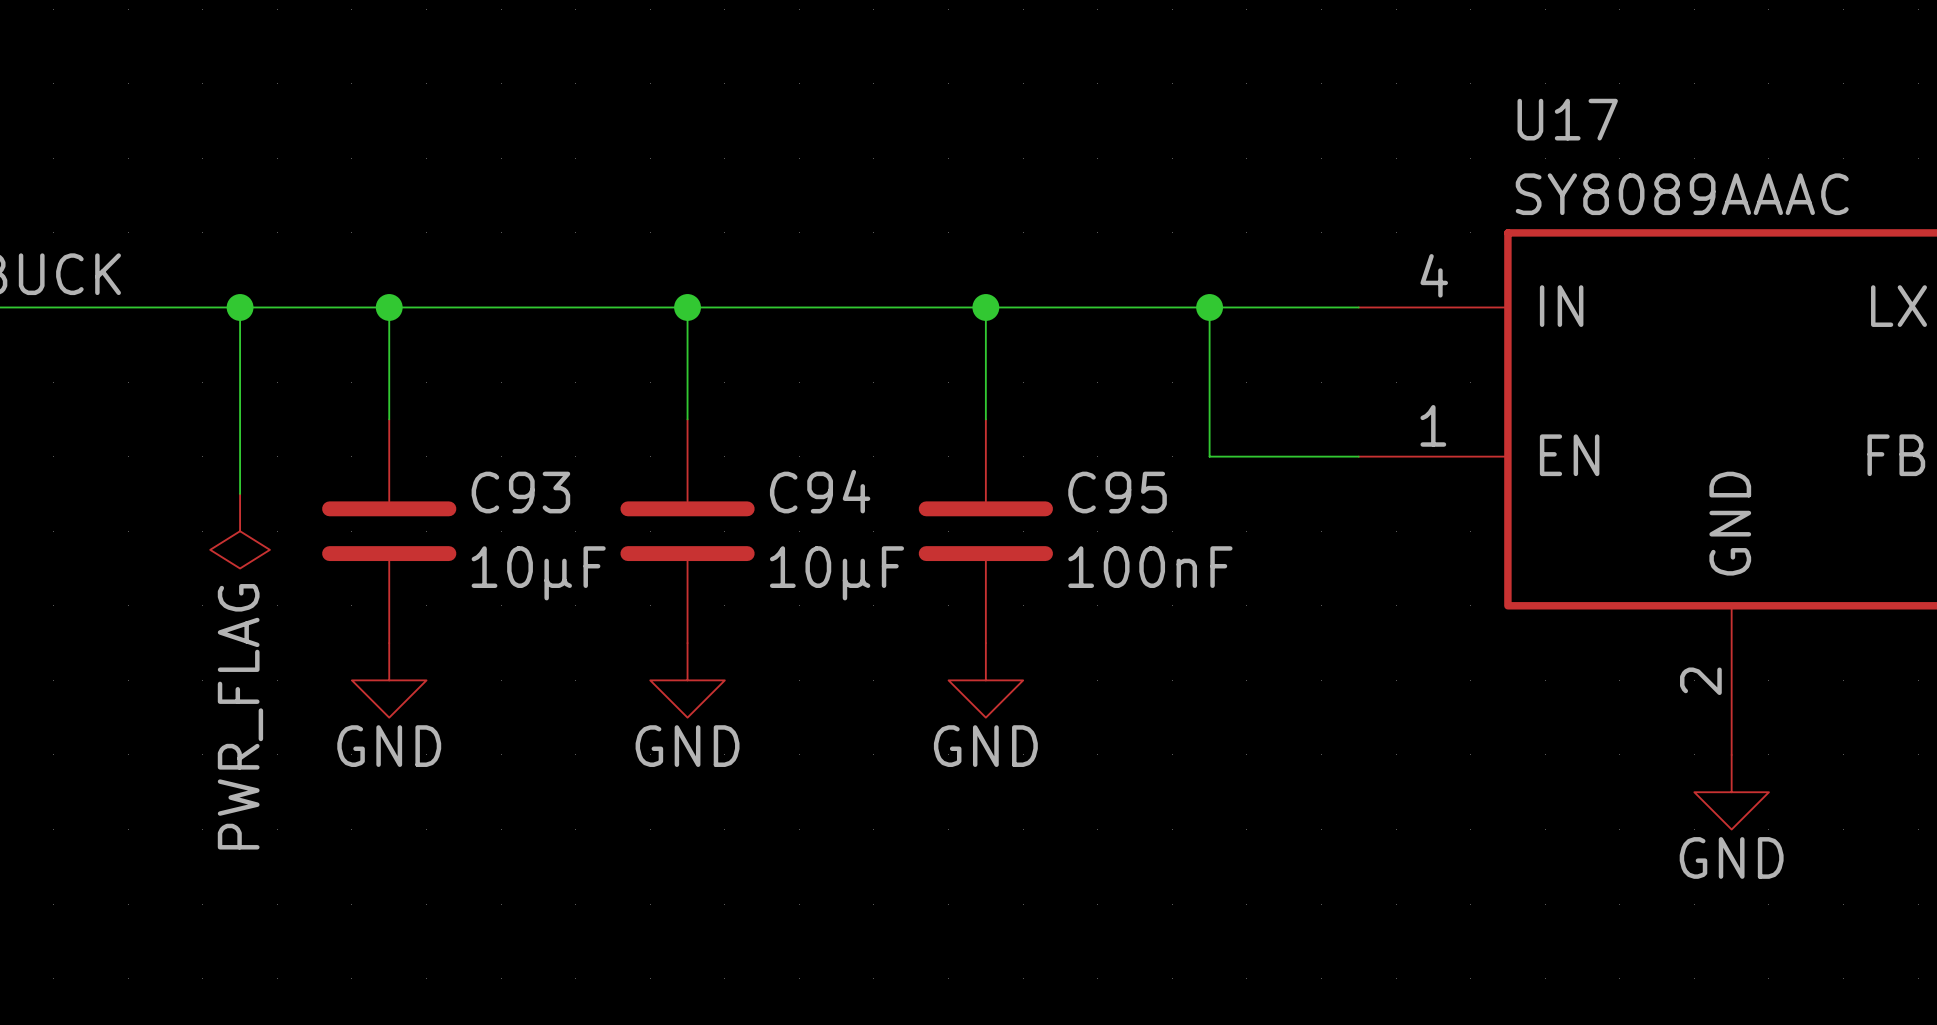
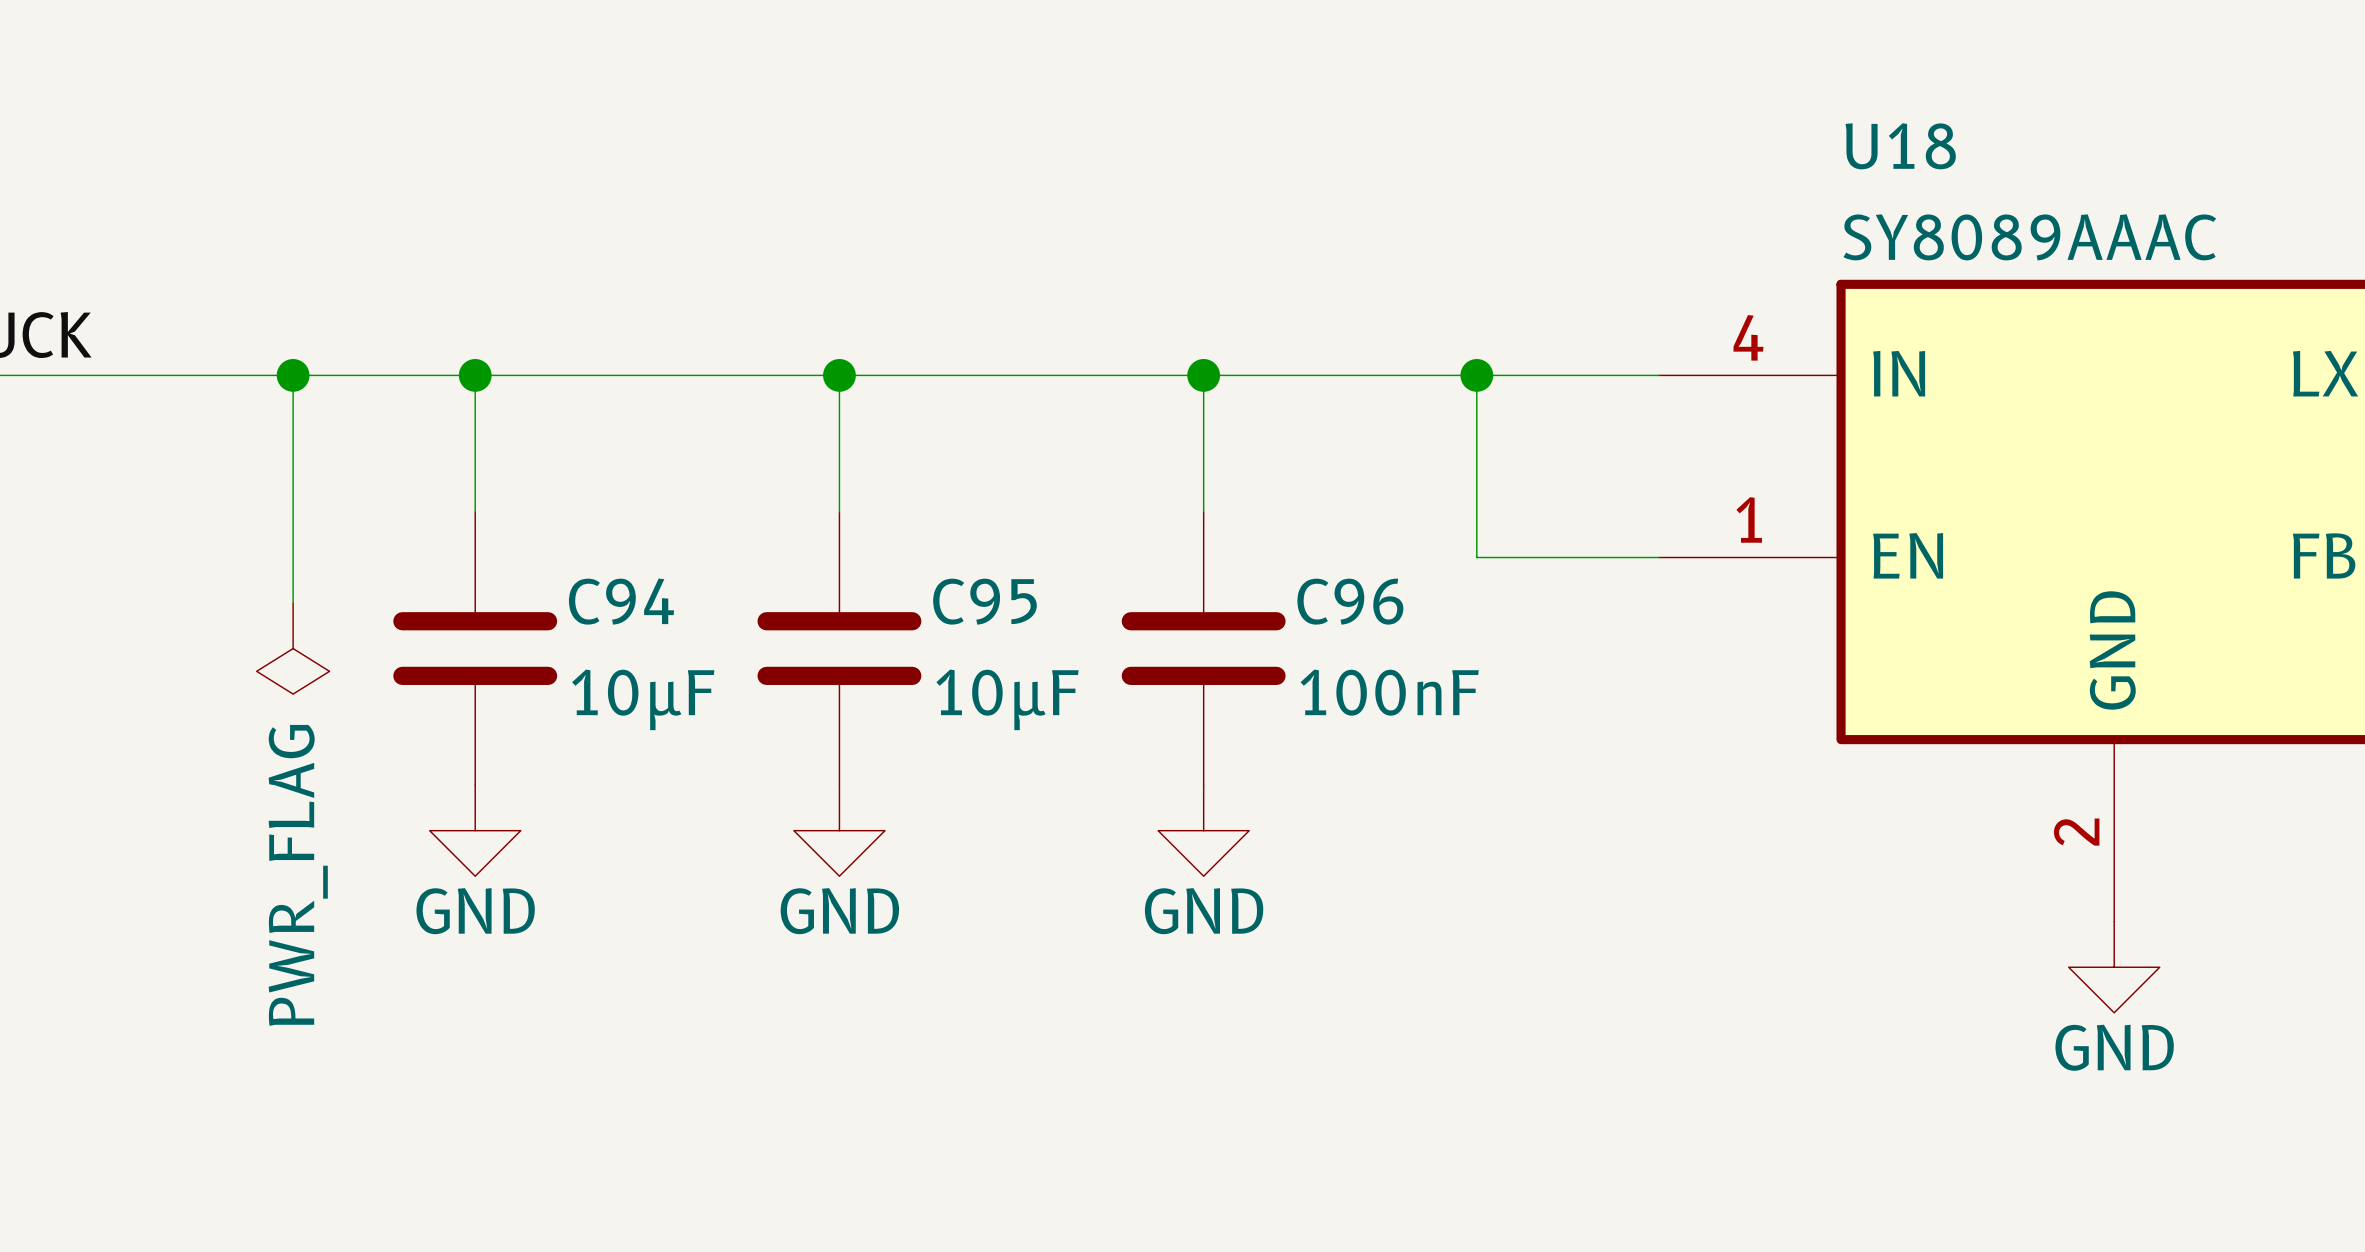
U17 name: U17 (1567, 119) -> U18 (1900, 146)
C94 name: C94 (820, 491) -> C95 (984, 601)
C93 name: C93 (520, 492) -> C94 (621, 601)
C95 name: C95 (1117, 492) -> C96 (1350, 601)

